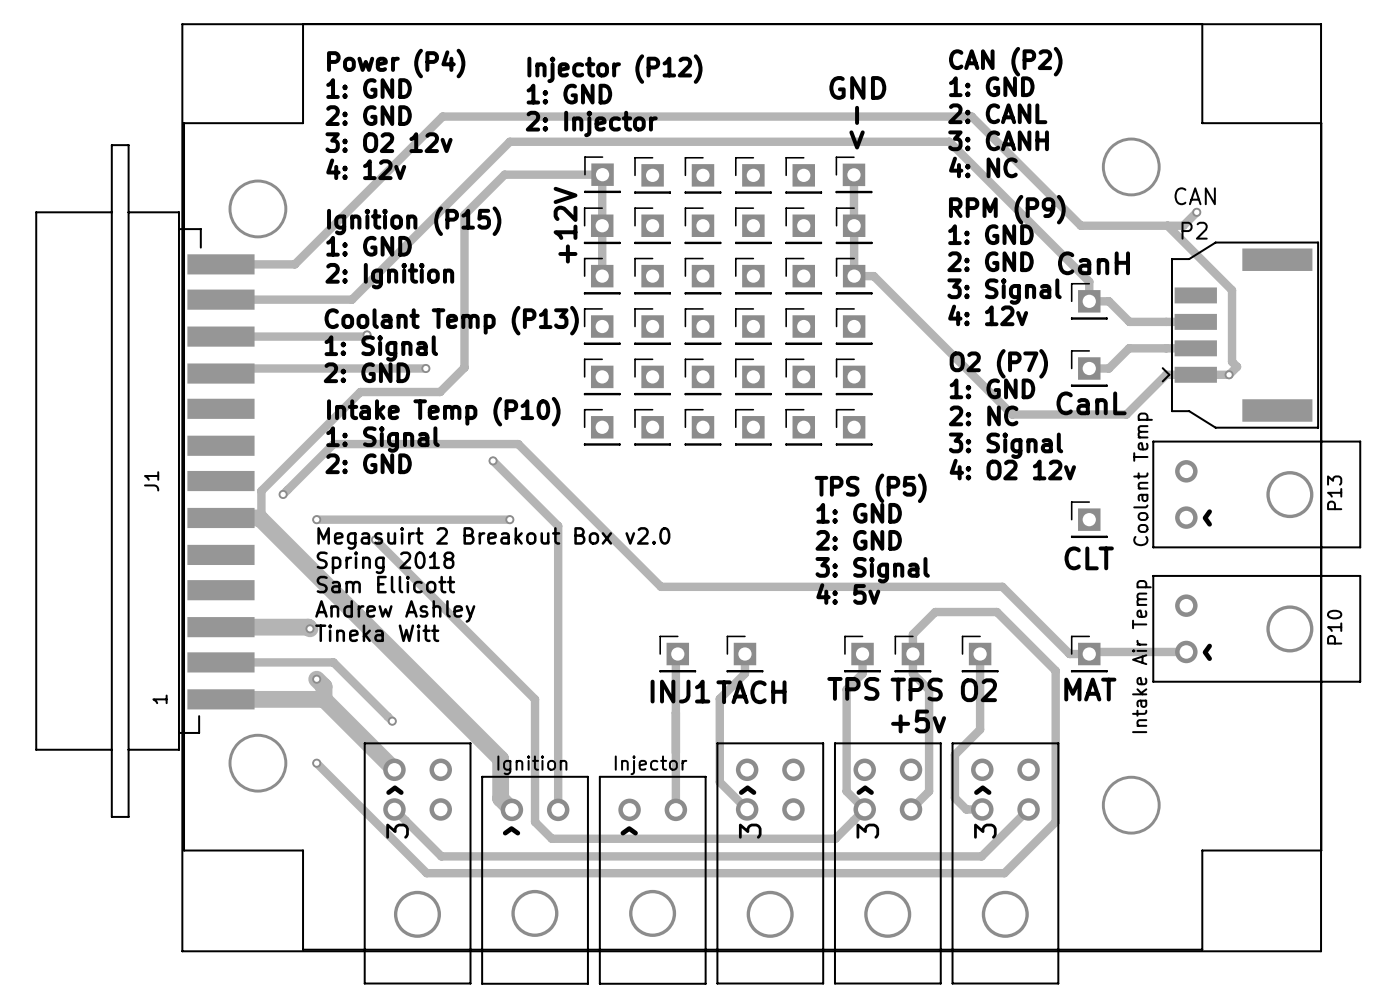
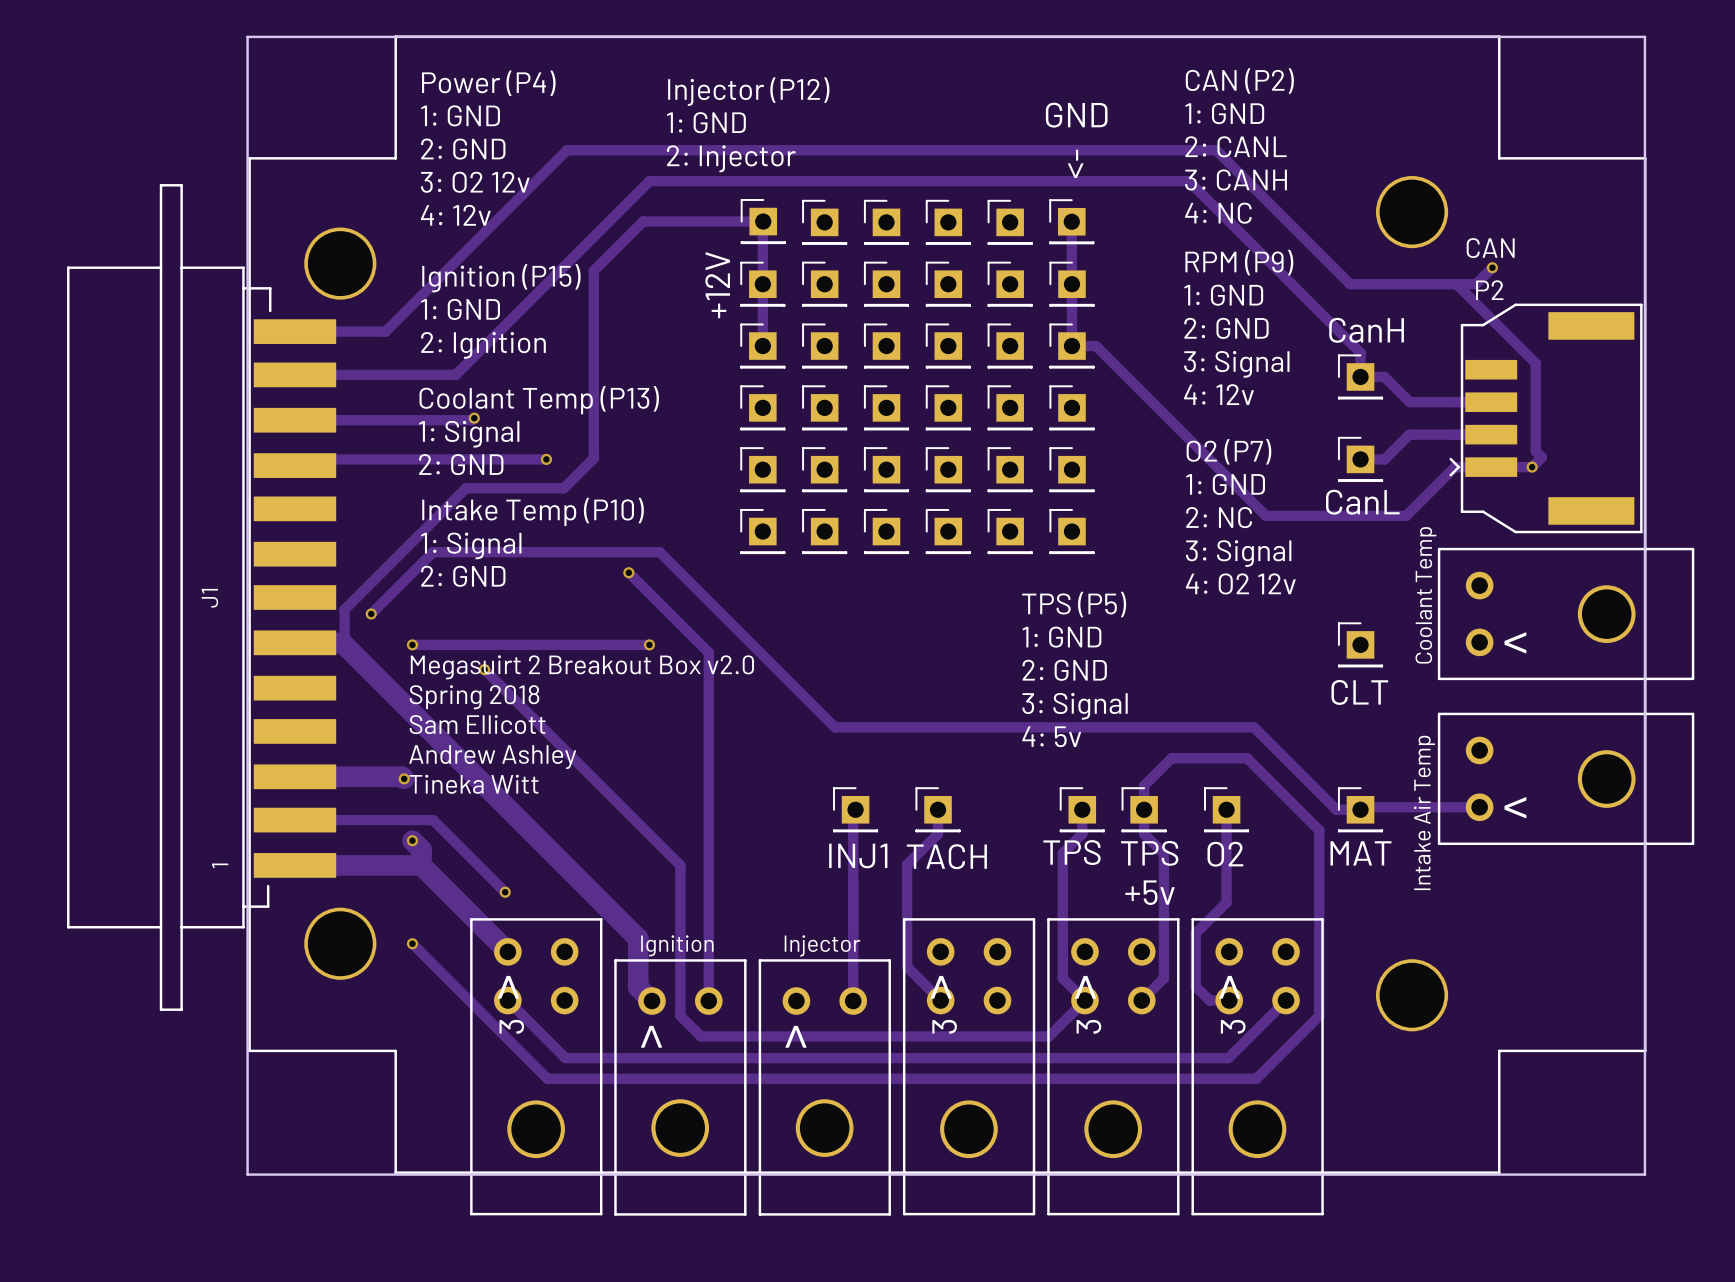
P13 name: P13 (1334, 492) -> none
P10 name: P10 (1334, 627) -> none

